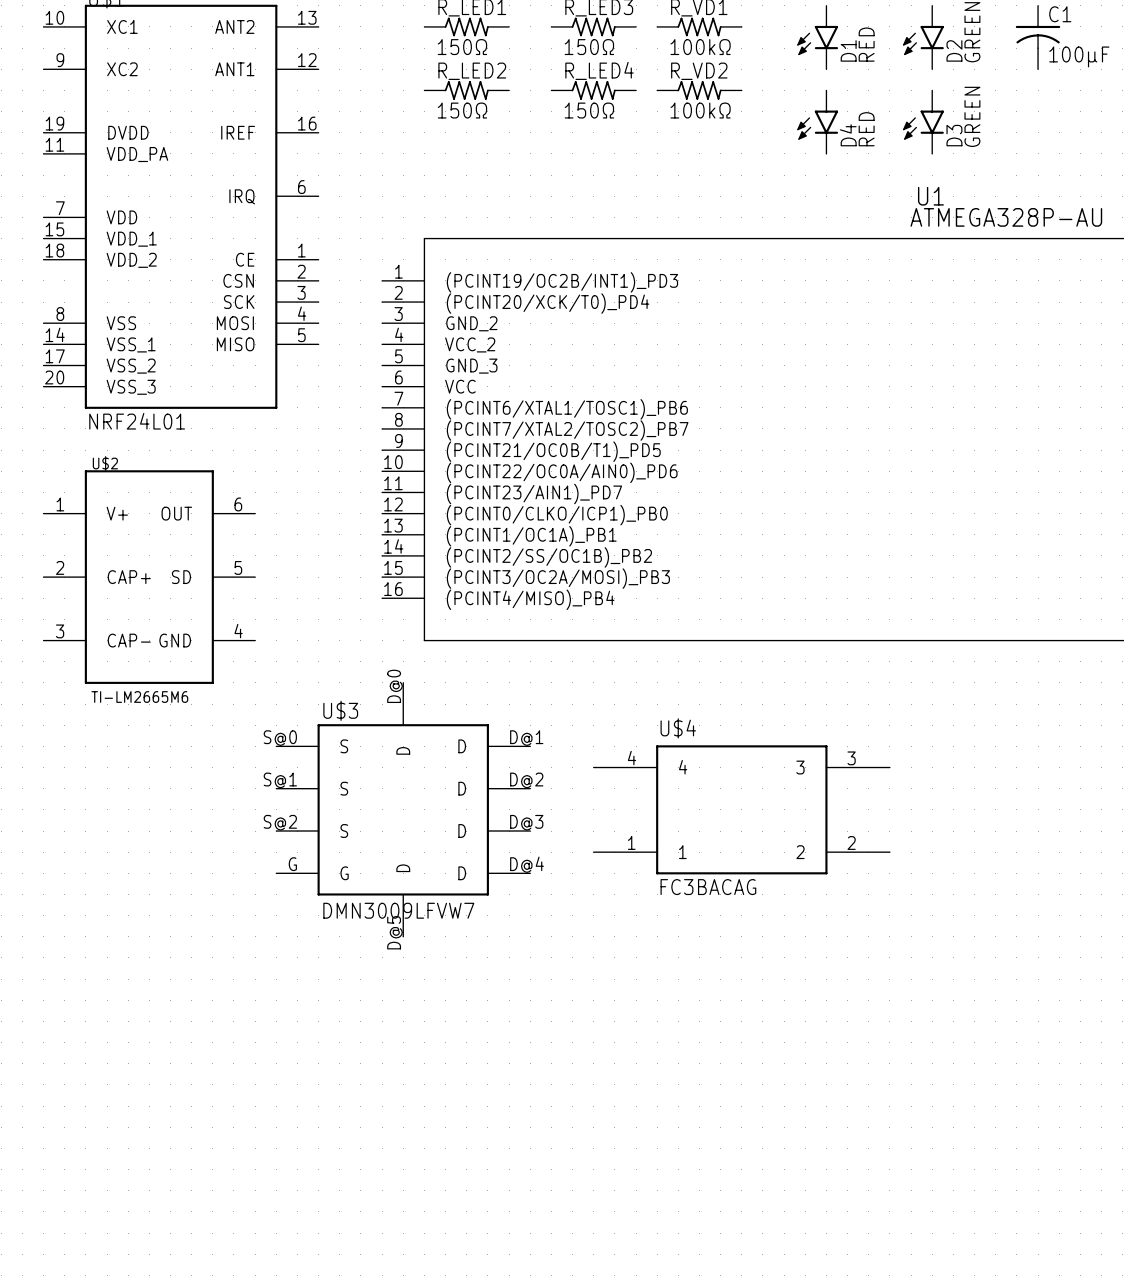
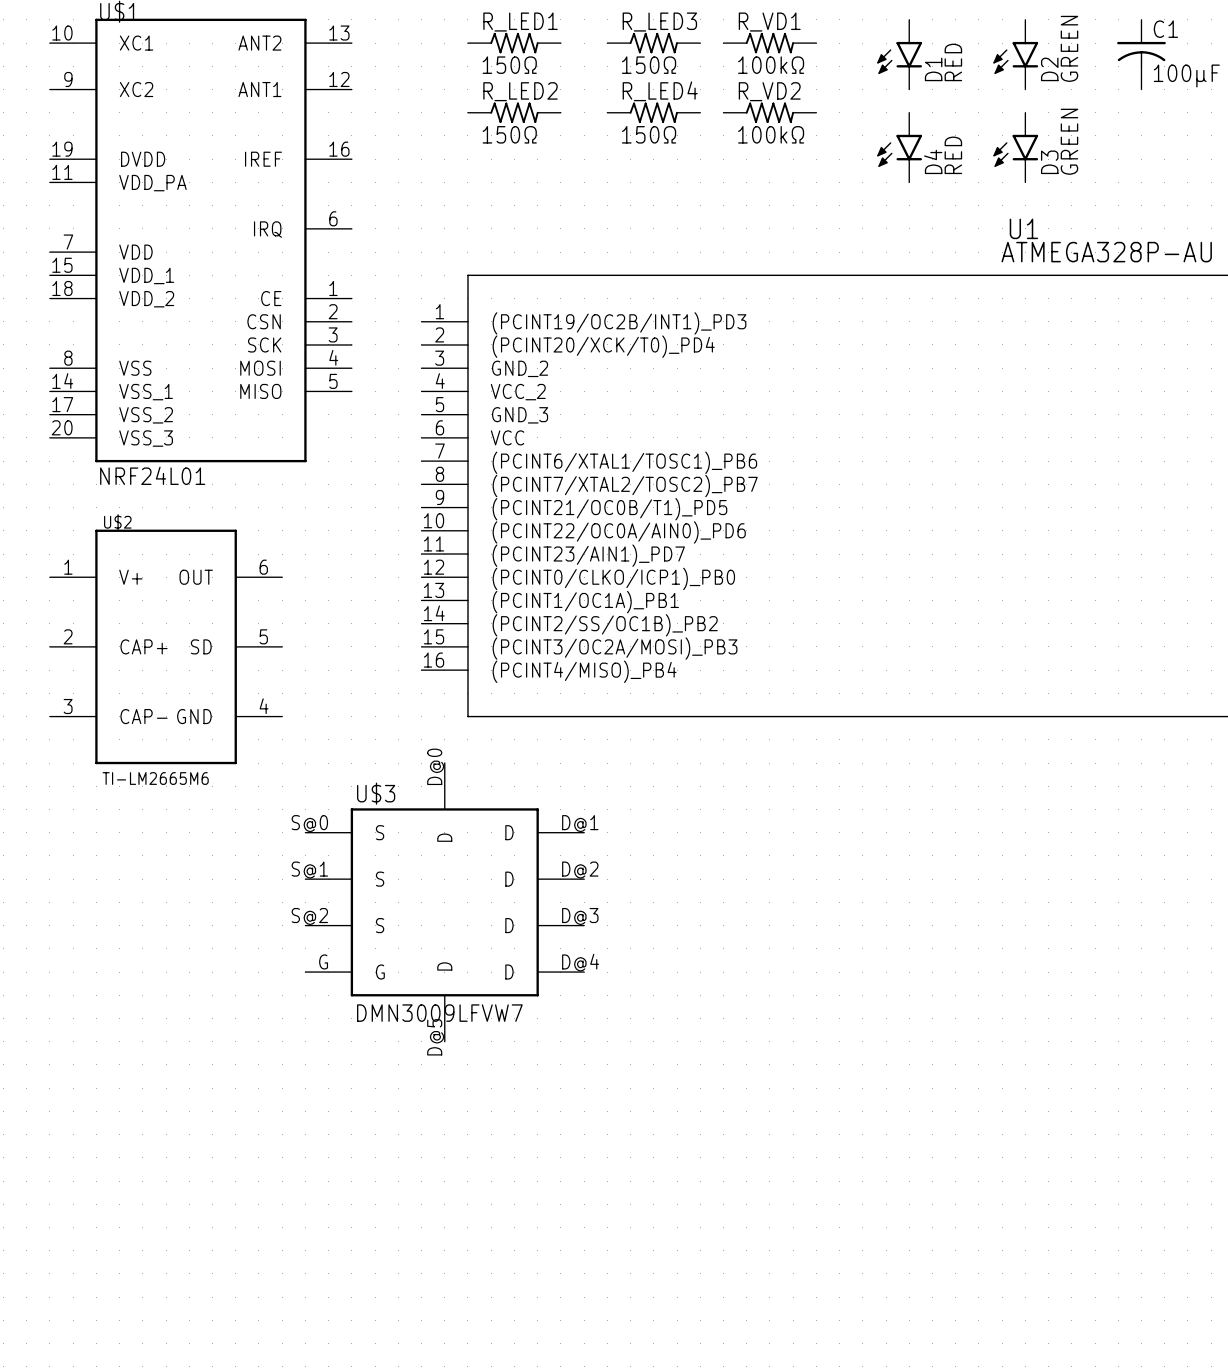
U$4: FC3BACAG (741, 809) -> none

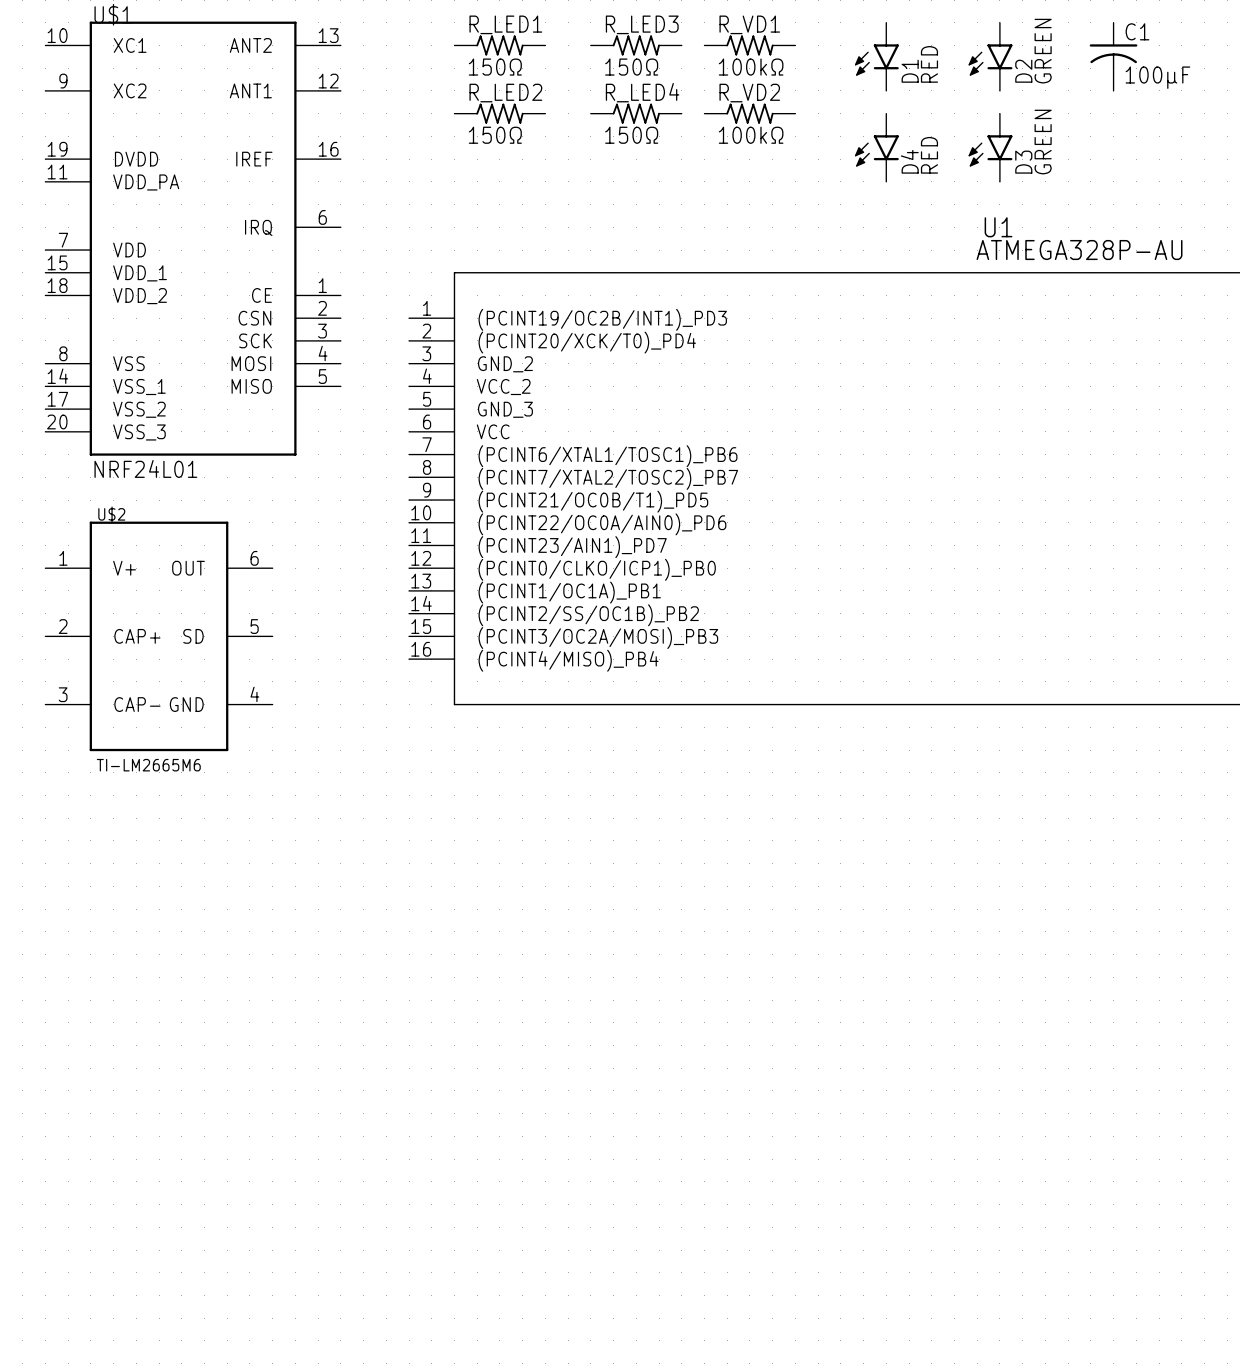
U$3: DMN3009LFVW7 (444, 902) -> none

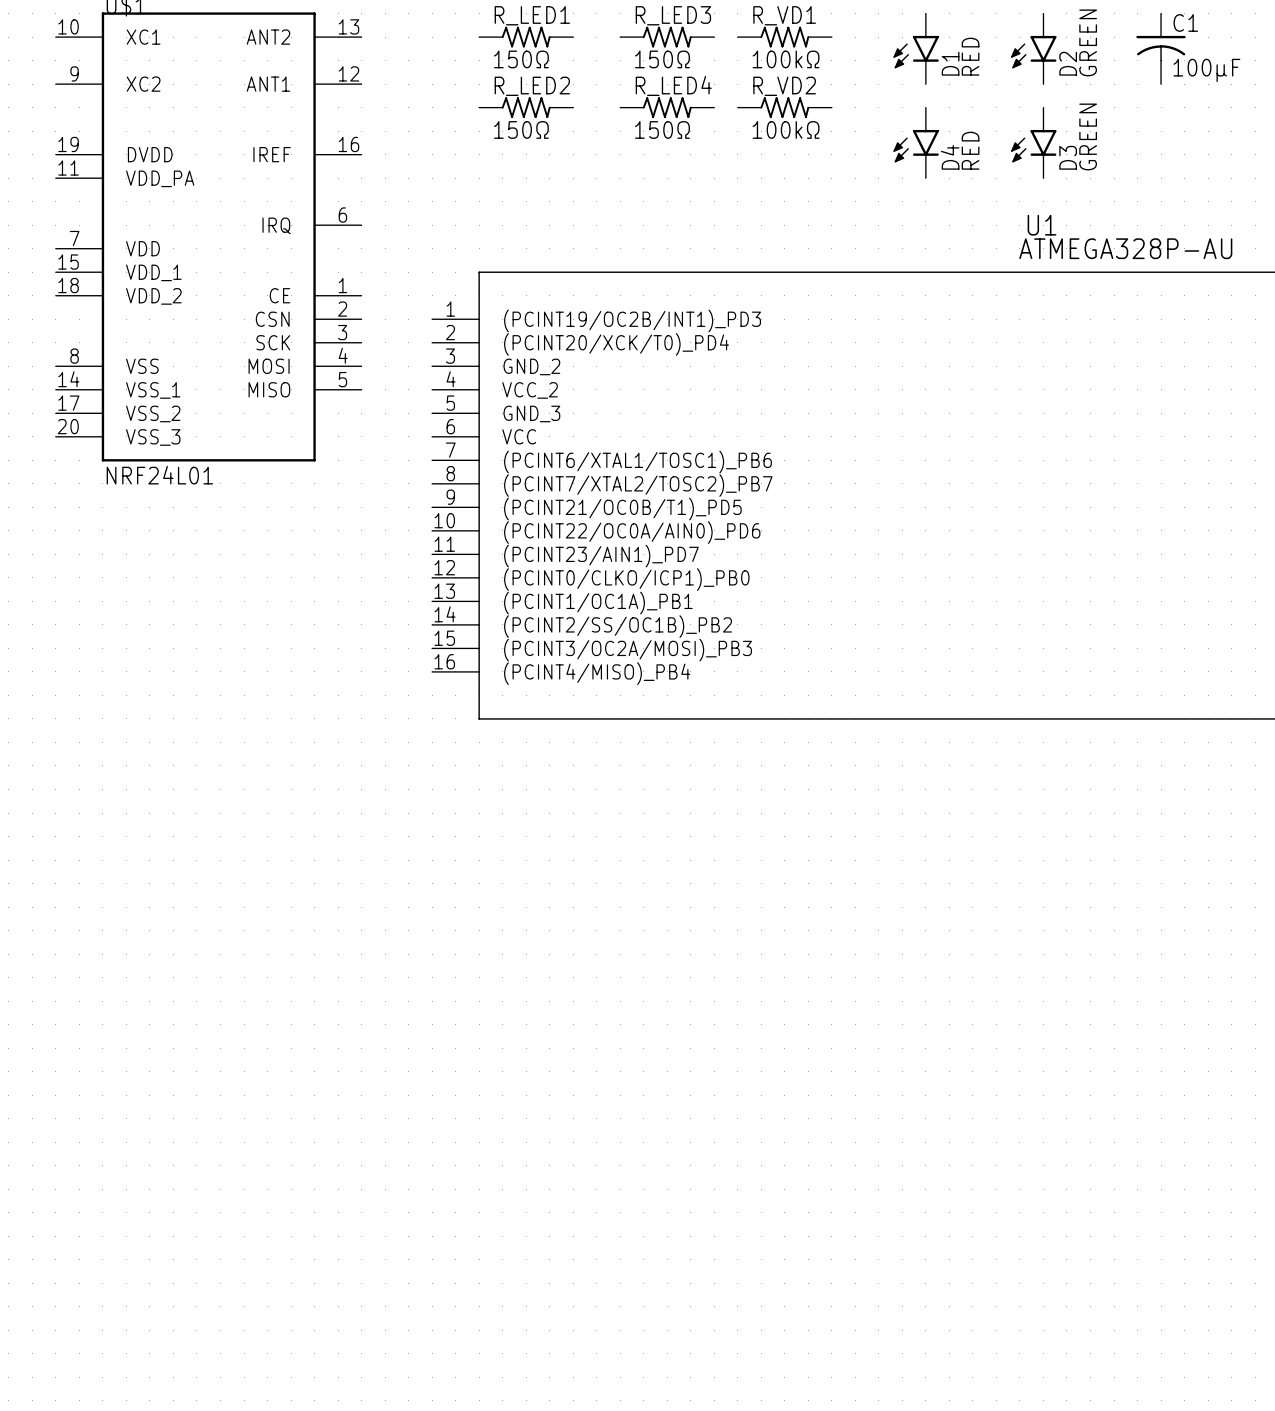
U$2: TI-LM2665M6 (159, 636) -> none

